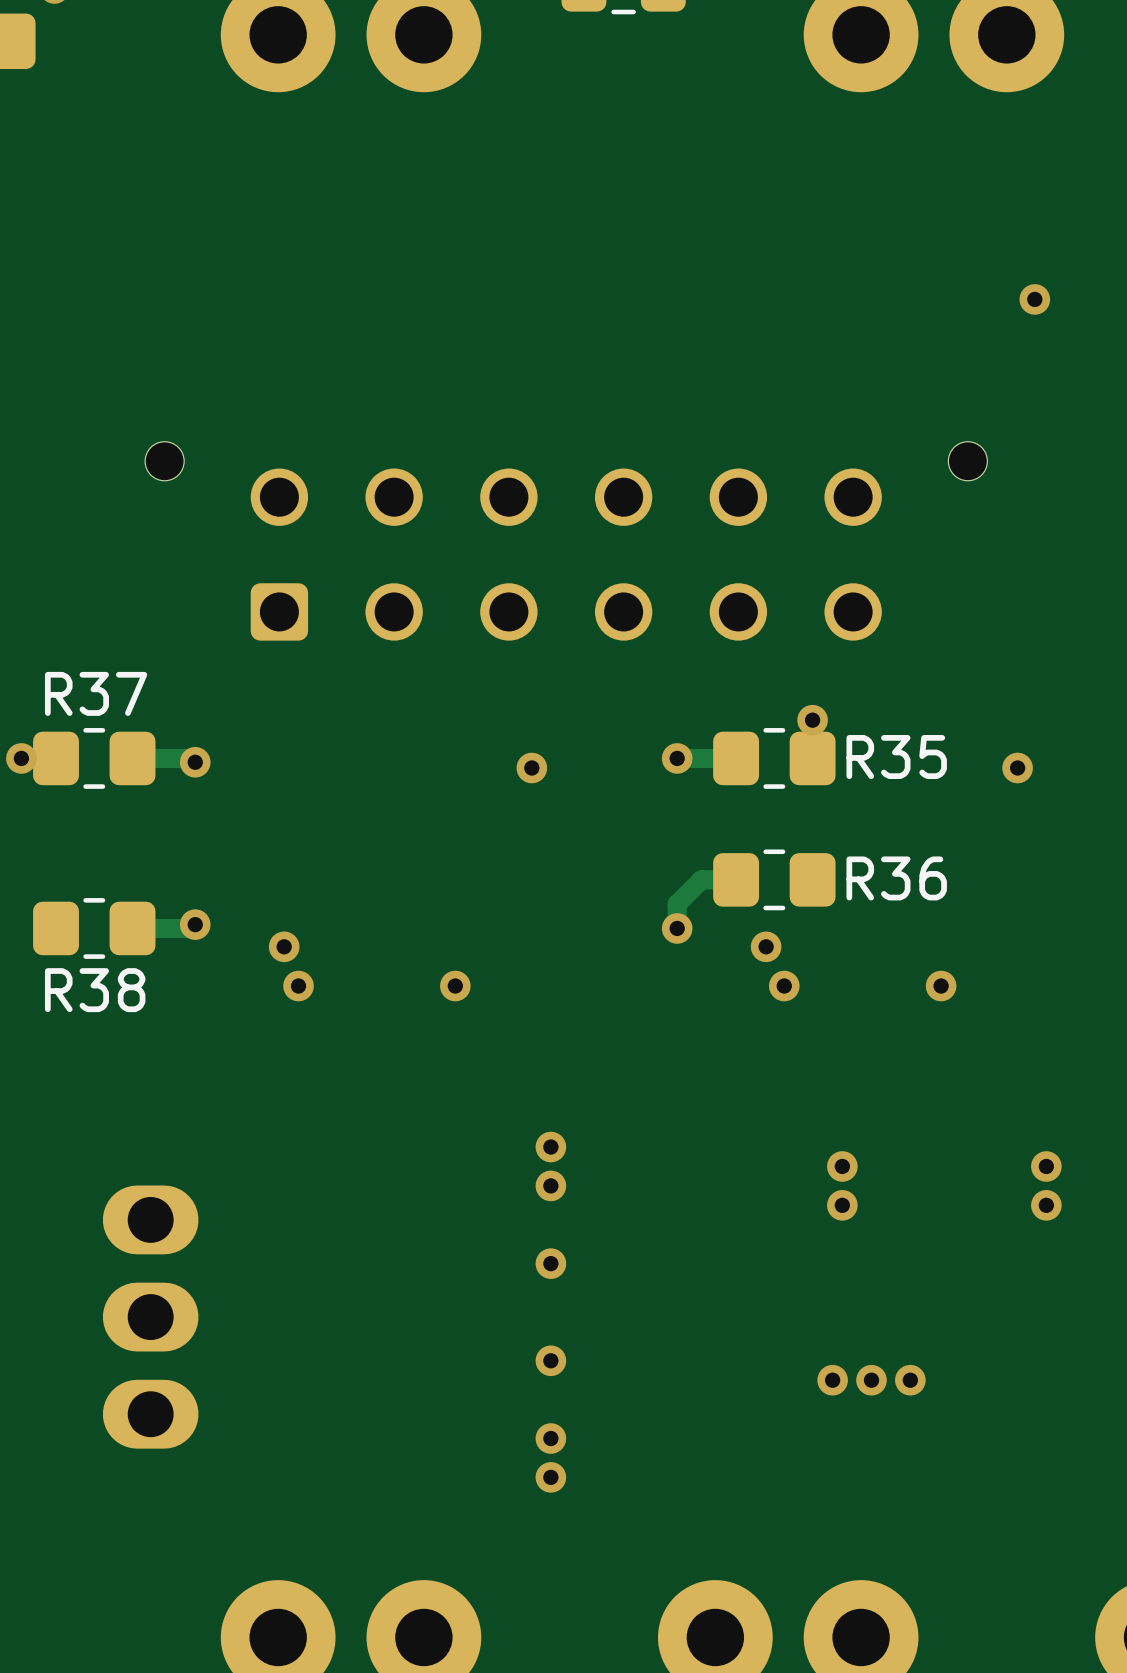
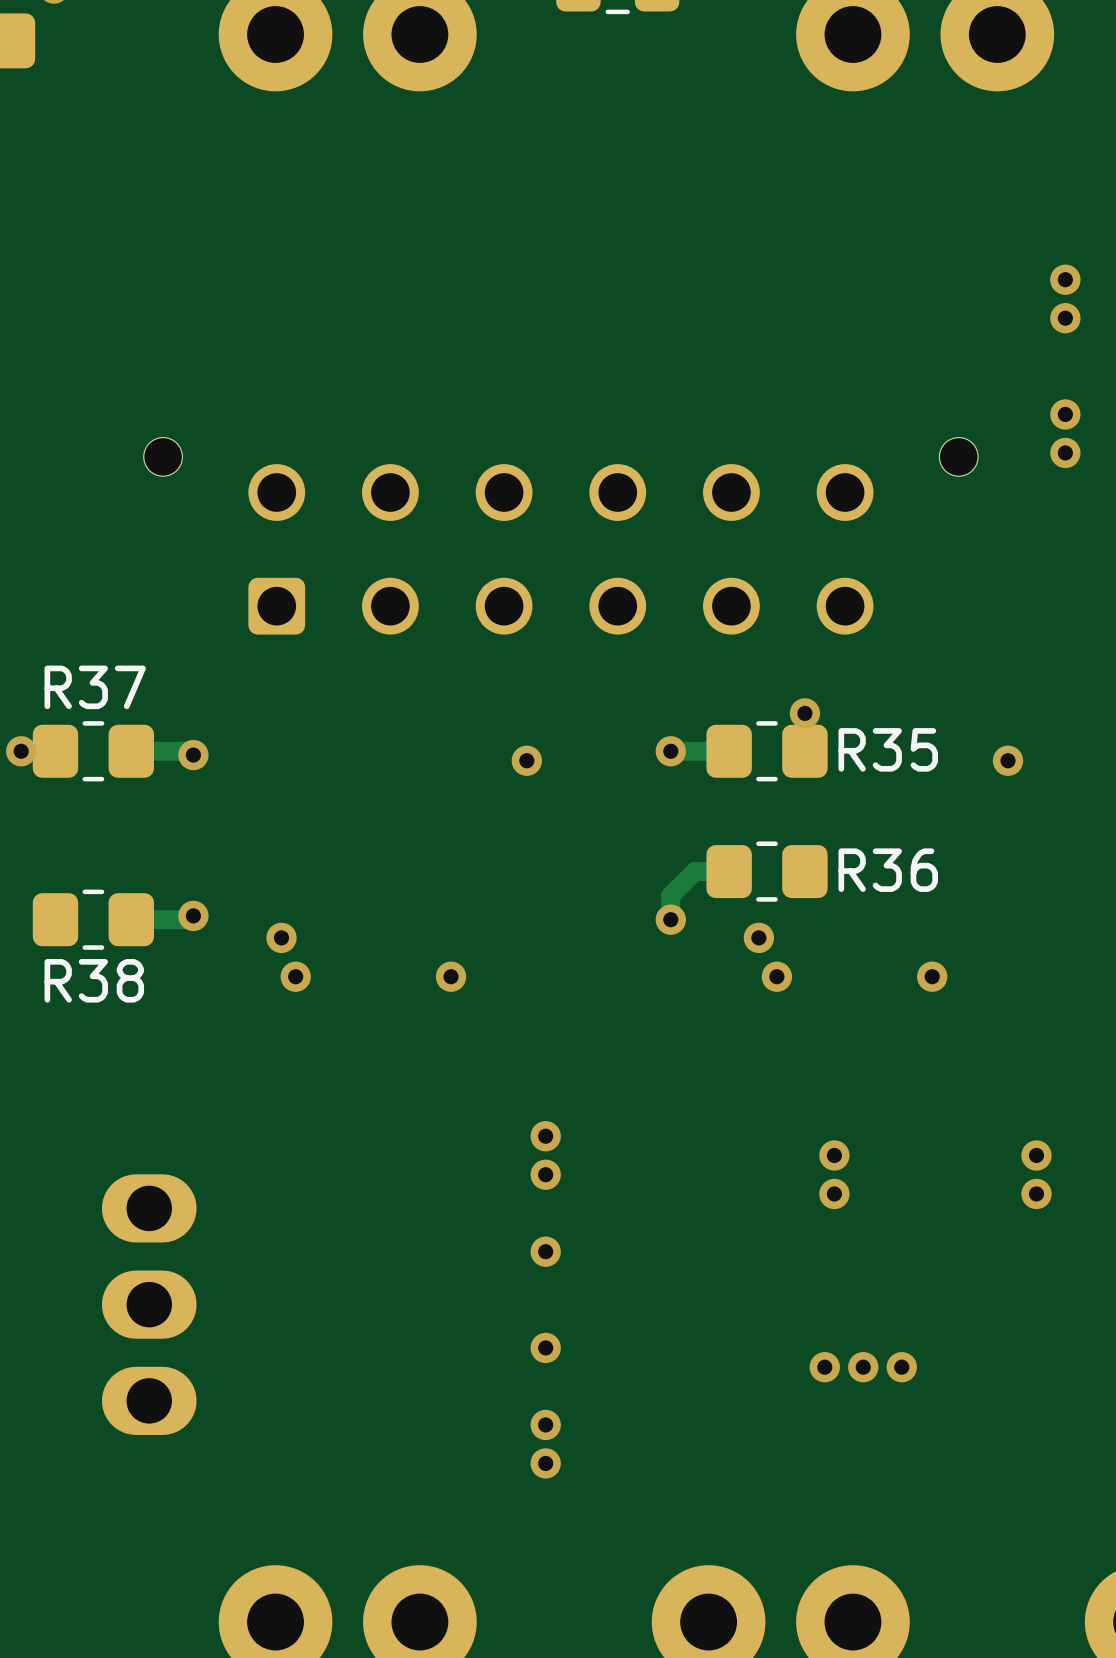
via: none -> (1065, 279)
via: (1034, 299) -> none
via: none -> (1065, 318)
via: none -> (1065, 414)
via: none -> (1065, 452)

